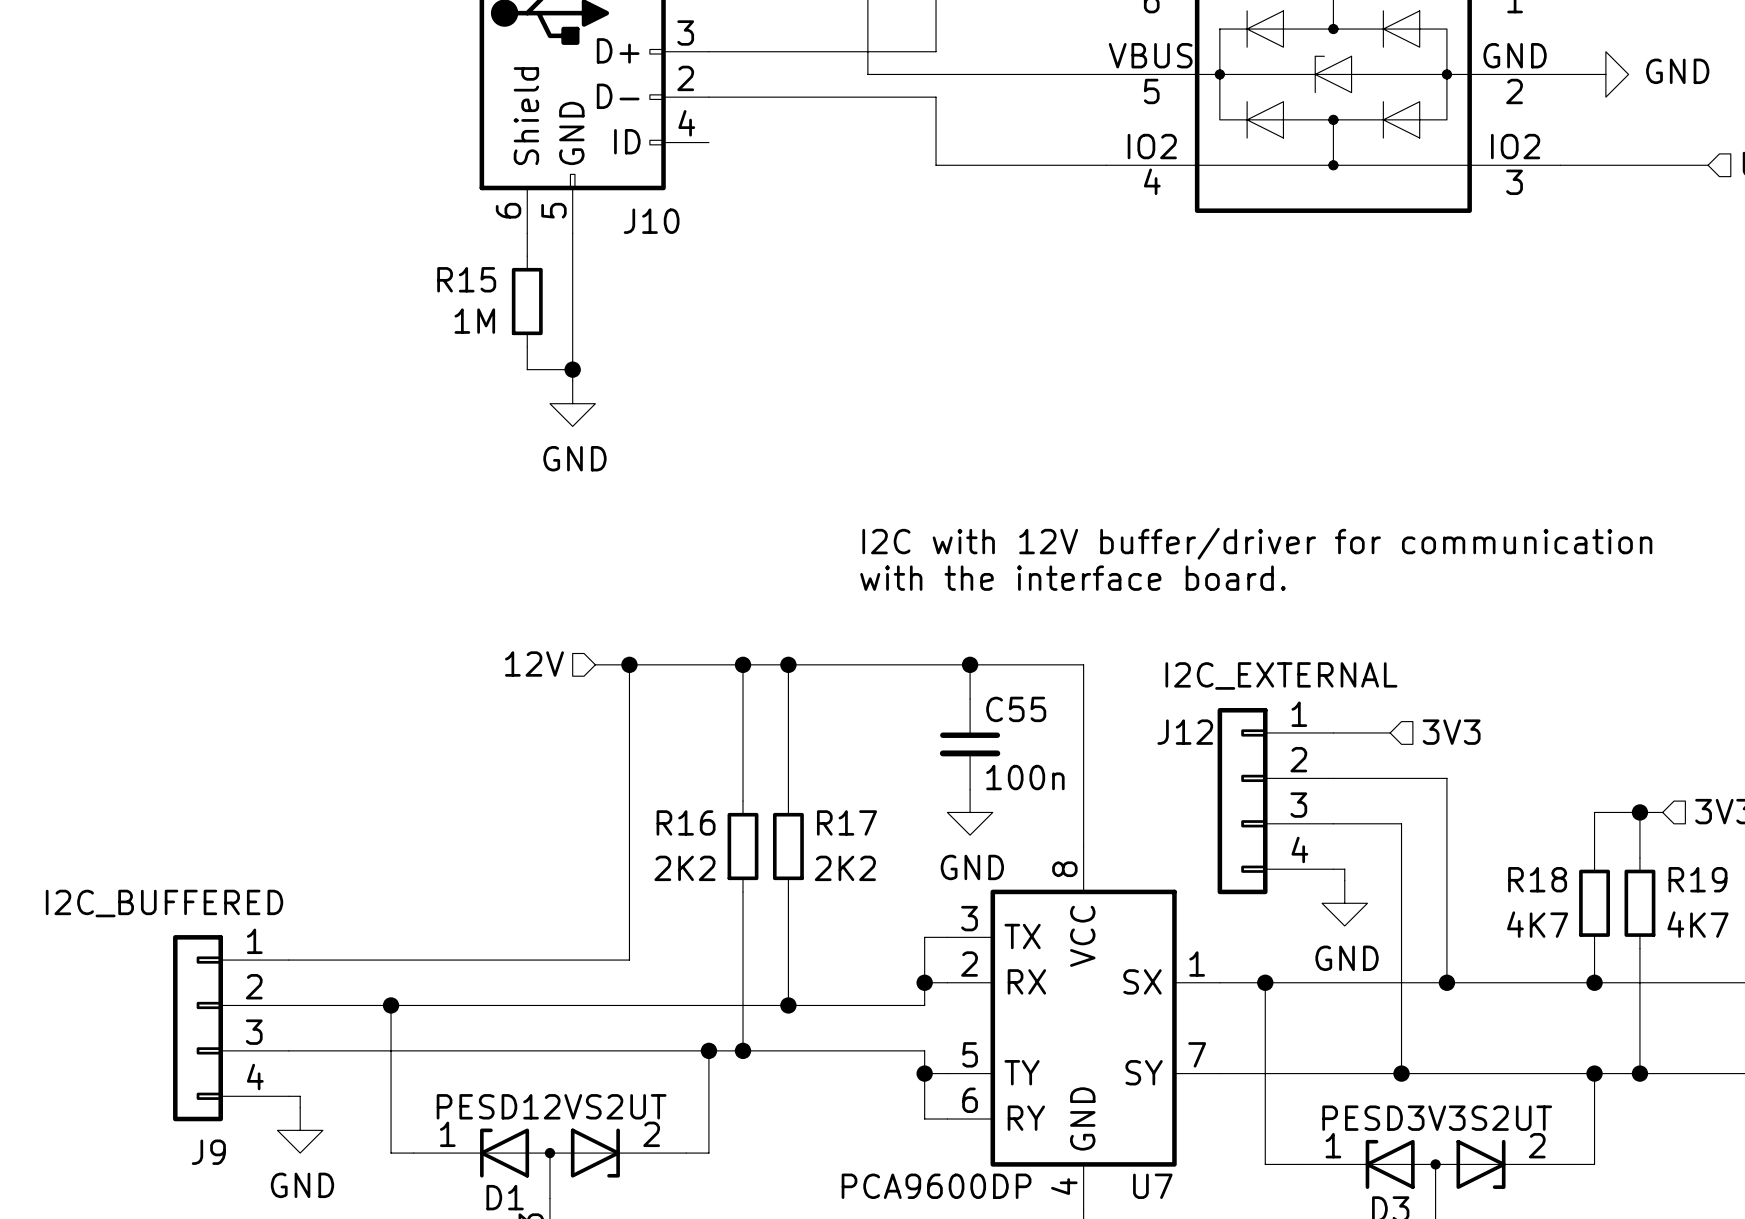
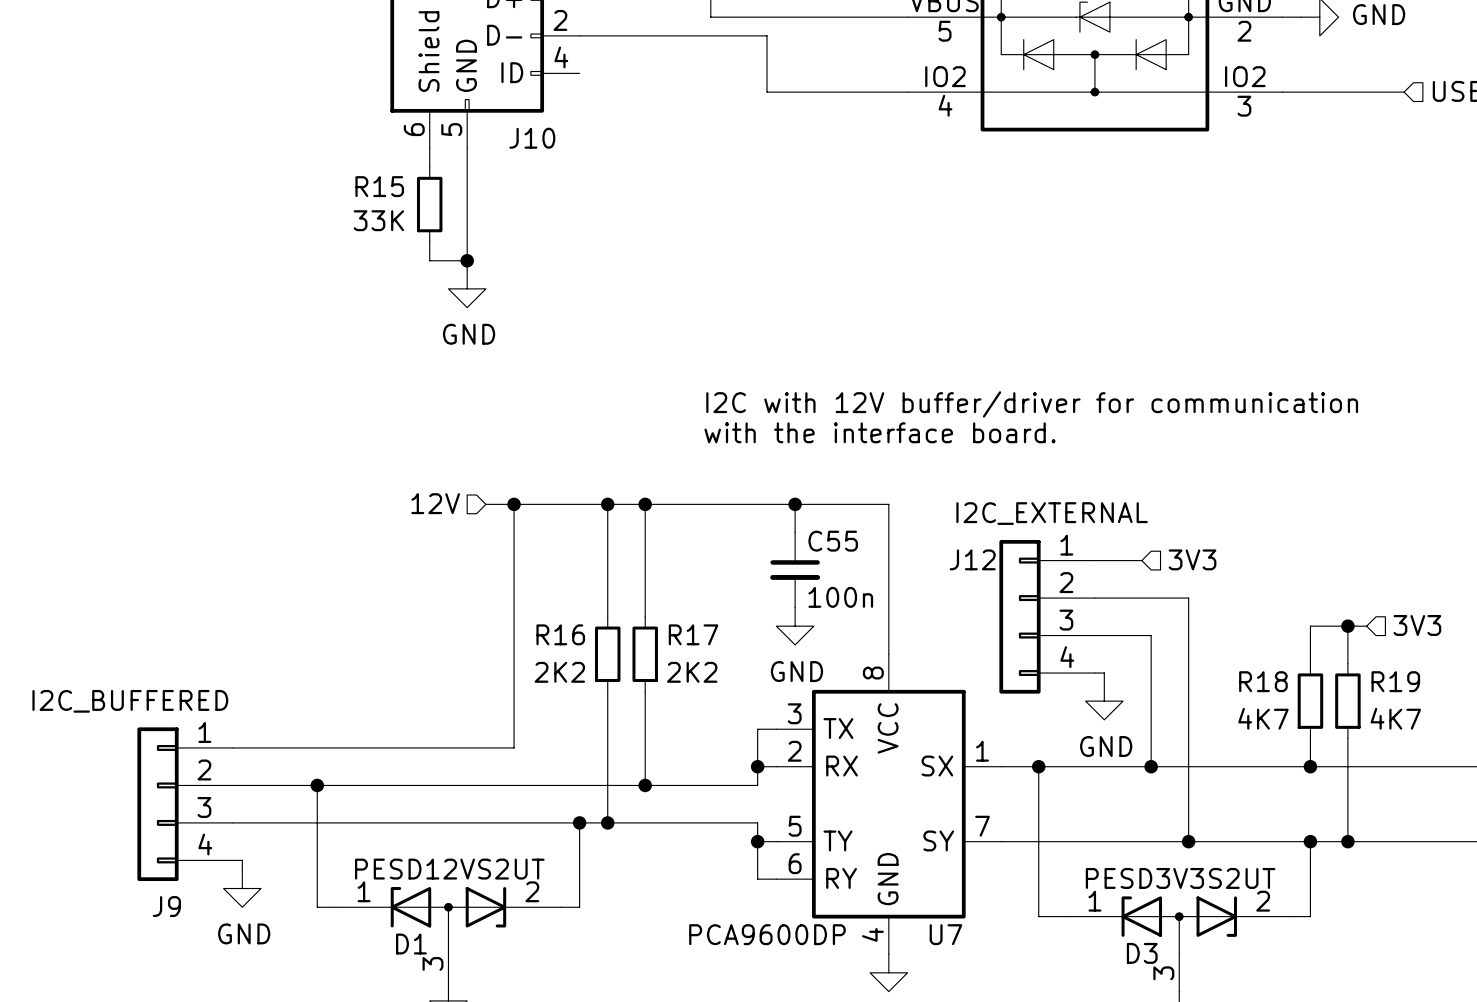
R15 value: 1M (474, 321) -> 33K (378, 220)
wire: (1401, 982) (1401, 1073) -> (1188, 766) (1188, 841)
junction: none -> (1151, 766)
junction: (1446, 982) -> none
junction: (1401, 1073) -> none
junction: none -> (1188, 841)

